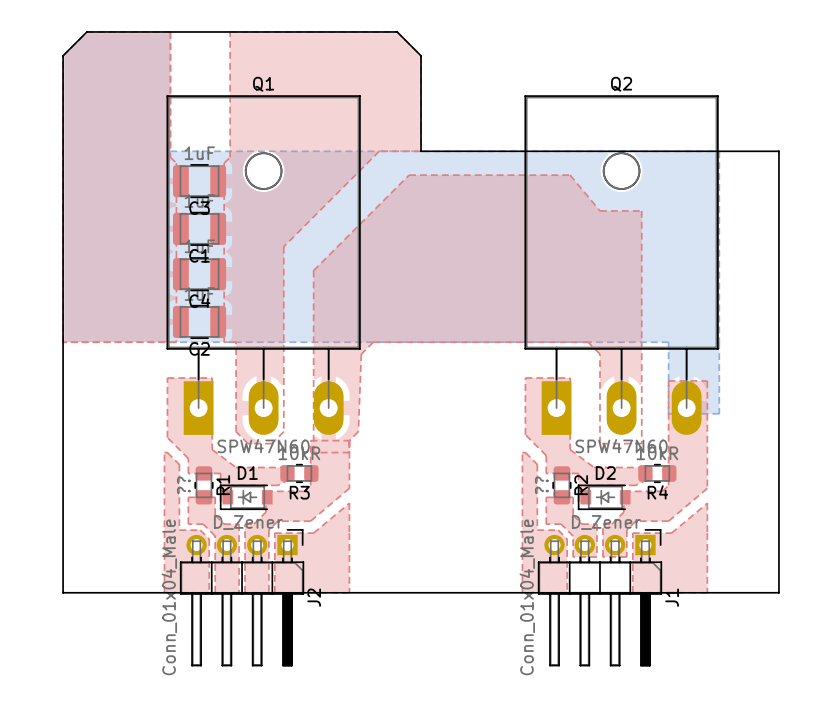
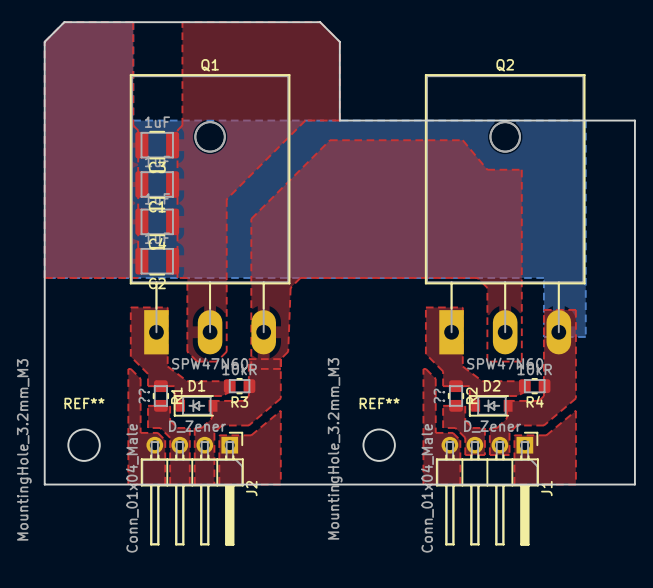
REF**: none -> MountingHole_3.2mm_M3 (84, 445)
REF**: none -> MountingHole_3.2mm_M3 (379, 445)

